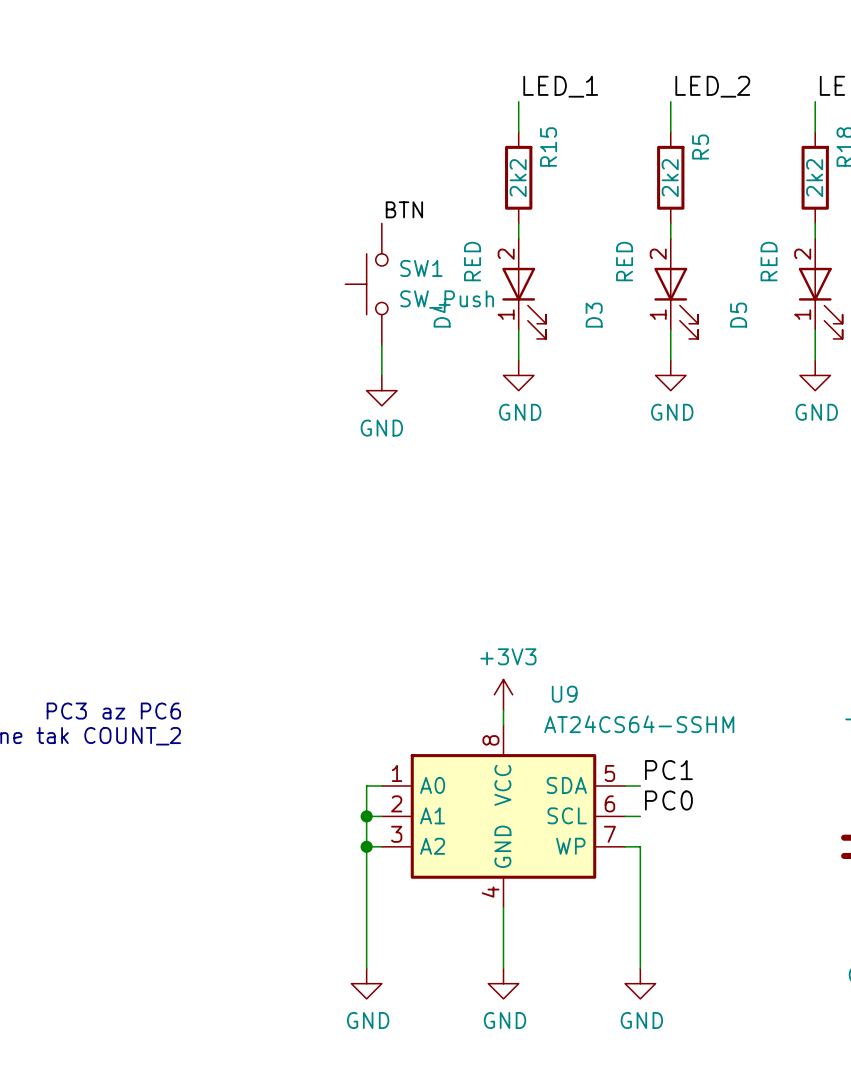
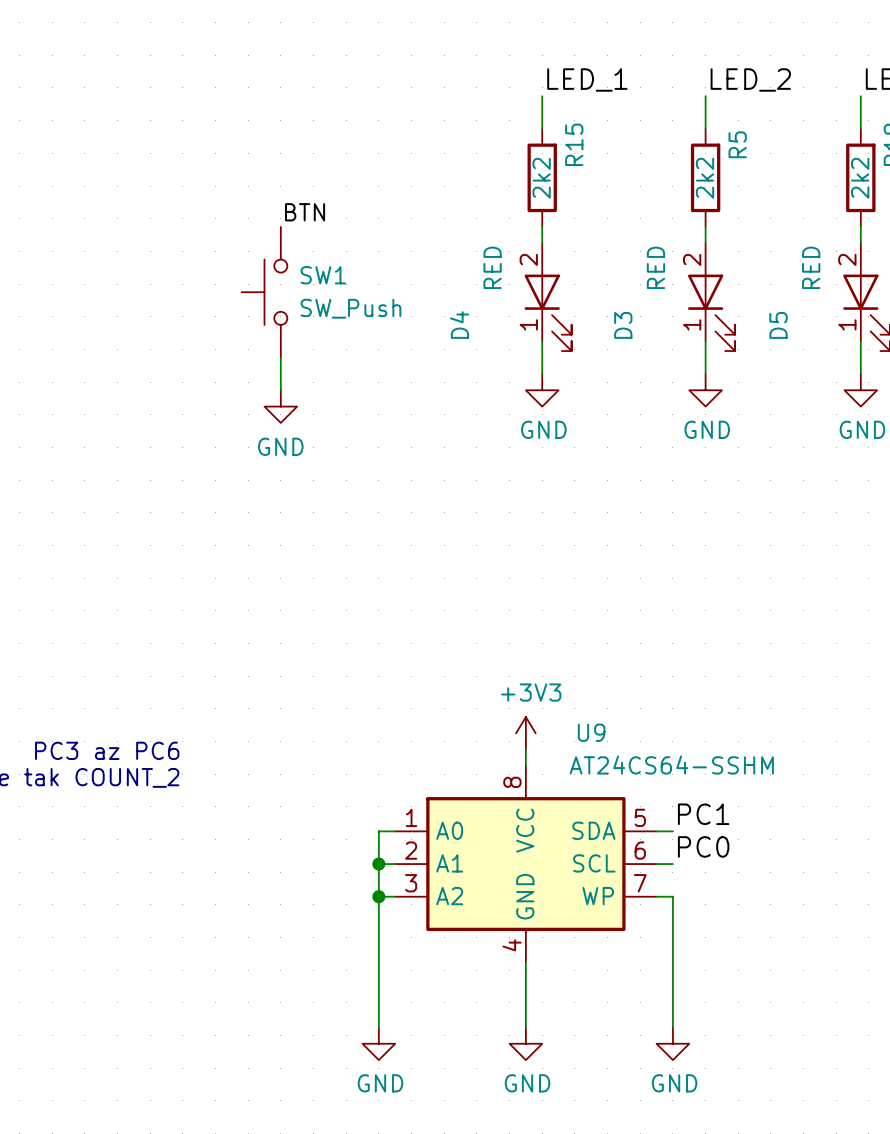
label position: BTN (404, 209) -> BTN (305, 212)
SW1 position: (366, 284) -> (264, 292)
wire: (381, 345) (381, 375) -> (280, 357) (280, 390)
power symbol position: GND (381, 390) -> GND (280, 406)

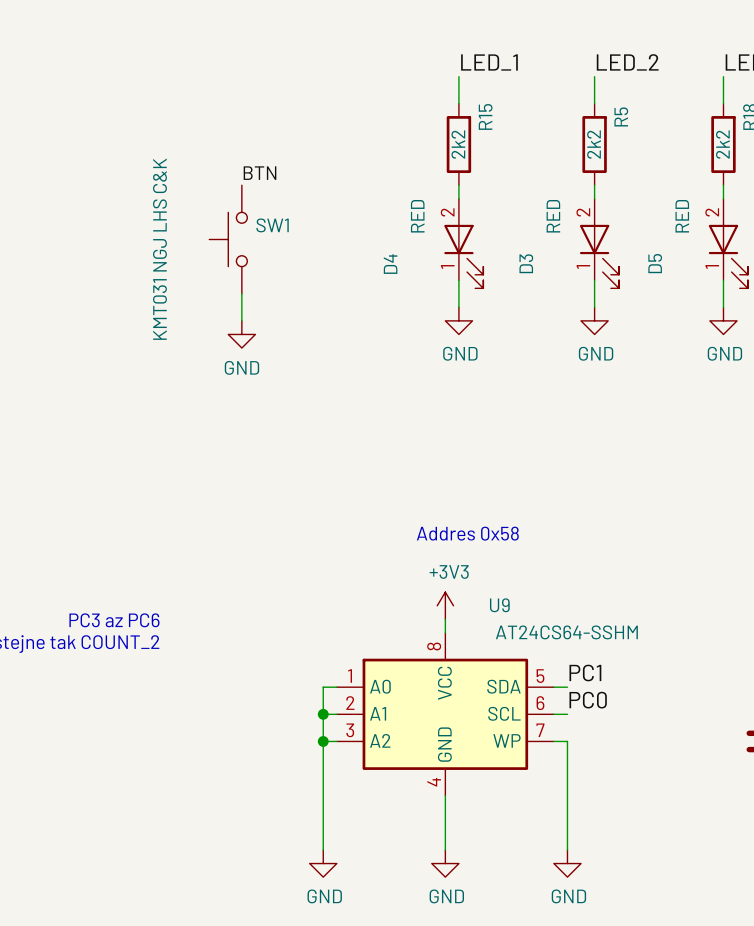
SW1 value: SW_Push (350, 308) -> KMT031 NGJ LHS C&K (159, 249)
text: none -> Addres 0x58 (467, 533)

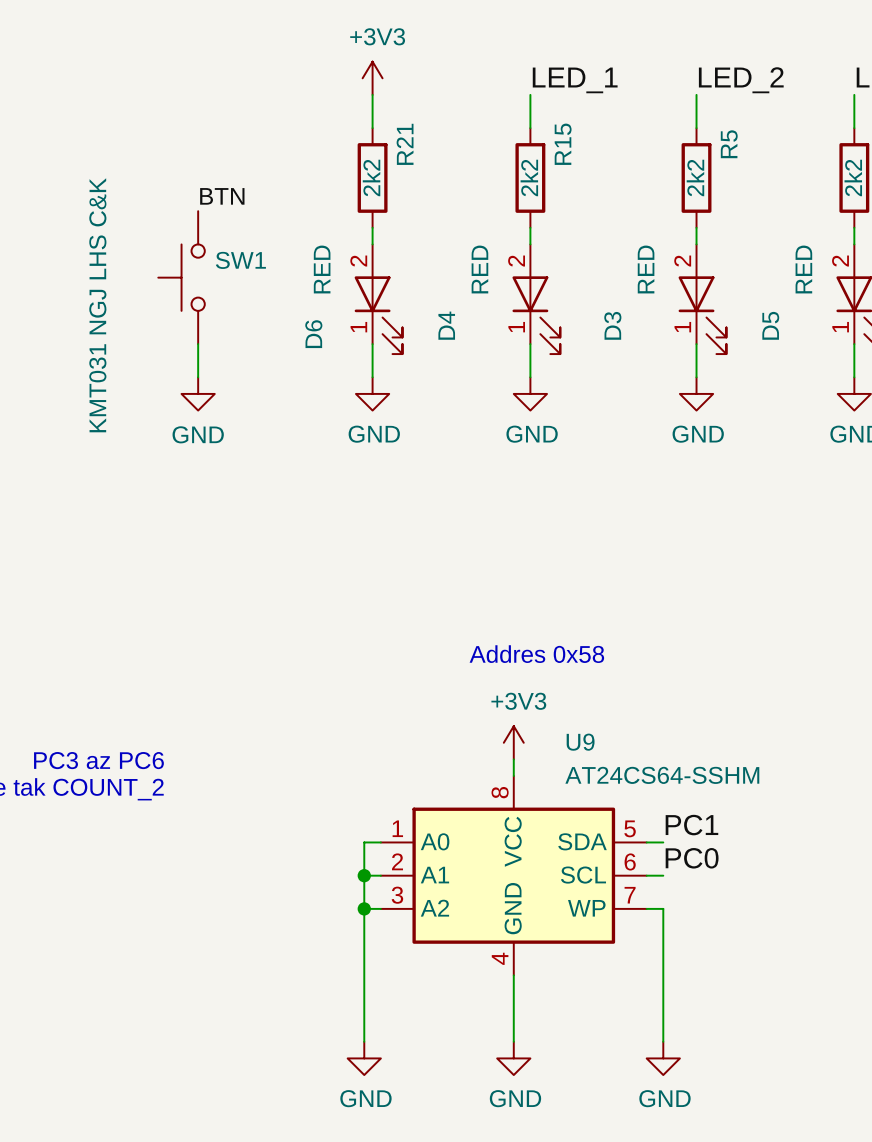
power symbol: none -> +3V3 (372, 78)
wire: none -> (372, 94) (372, 128)
R21: none -> 2k2 (372, 177)
label position: BTN (260, 173) -> BTN (222, 196)
wire: none -> (372, 227) (372, 244)
SW1 position: (228, 239) -> (181, 277)
D6: none -> RED (378, 299)
wire: none -> (372, 344) (372, 377)
wire: (241, 293) (241, 320) -> (198, 344) (198, 377)
power symbol: none -> GND (198, 393)
power symbol: none -> GND (372, 393)
power symbol: GND (241, 334) -> none

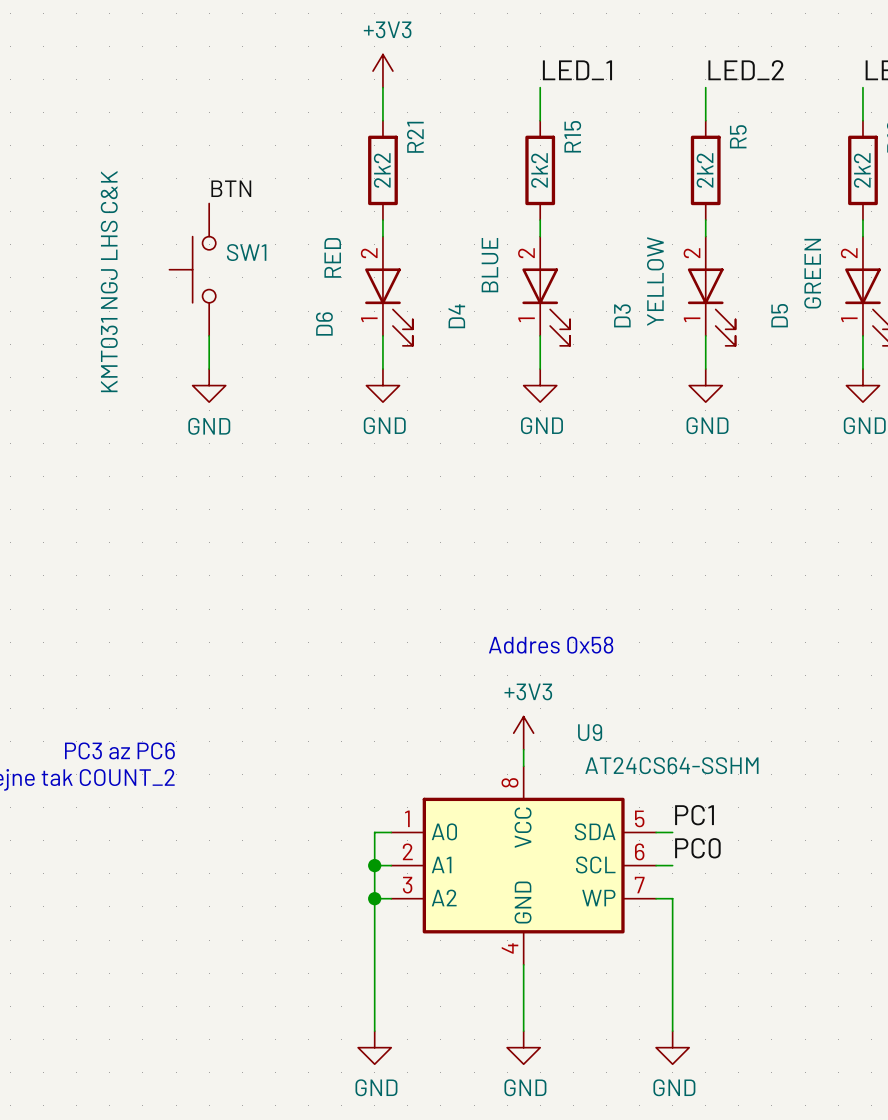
D4 value: RED (479, 269) -> BLUE (490, 265)
D3 value: RED (646, 269) -> YELLOW (655, 281)
D5 value: RED (803, 269) -> GREEN (812, 273)

